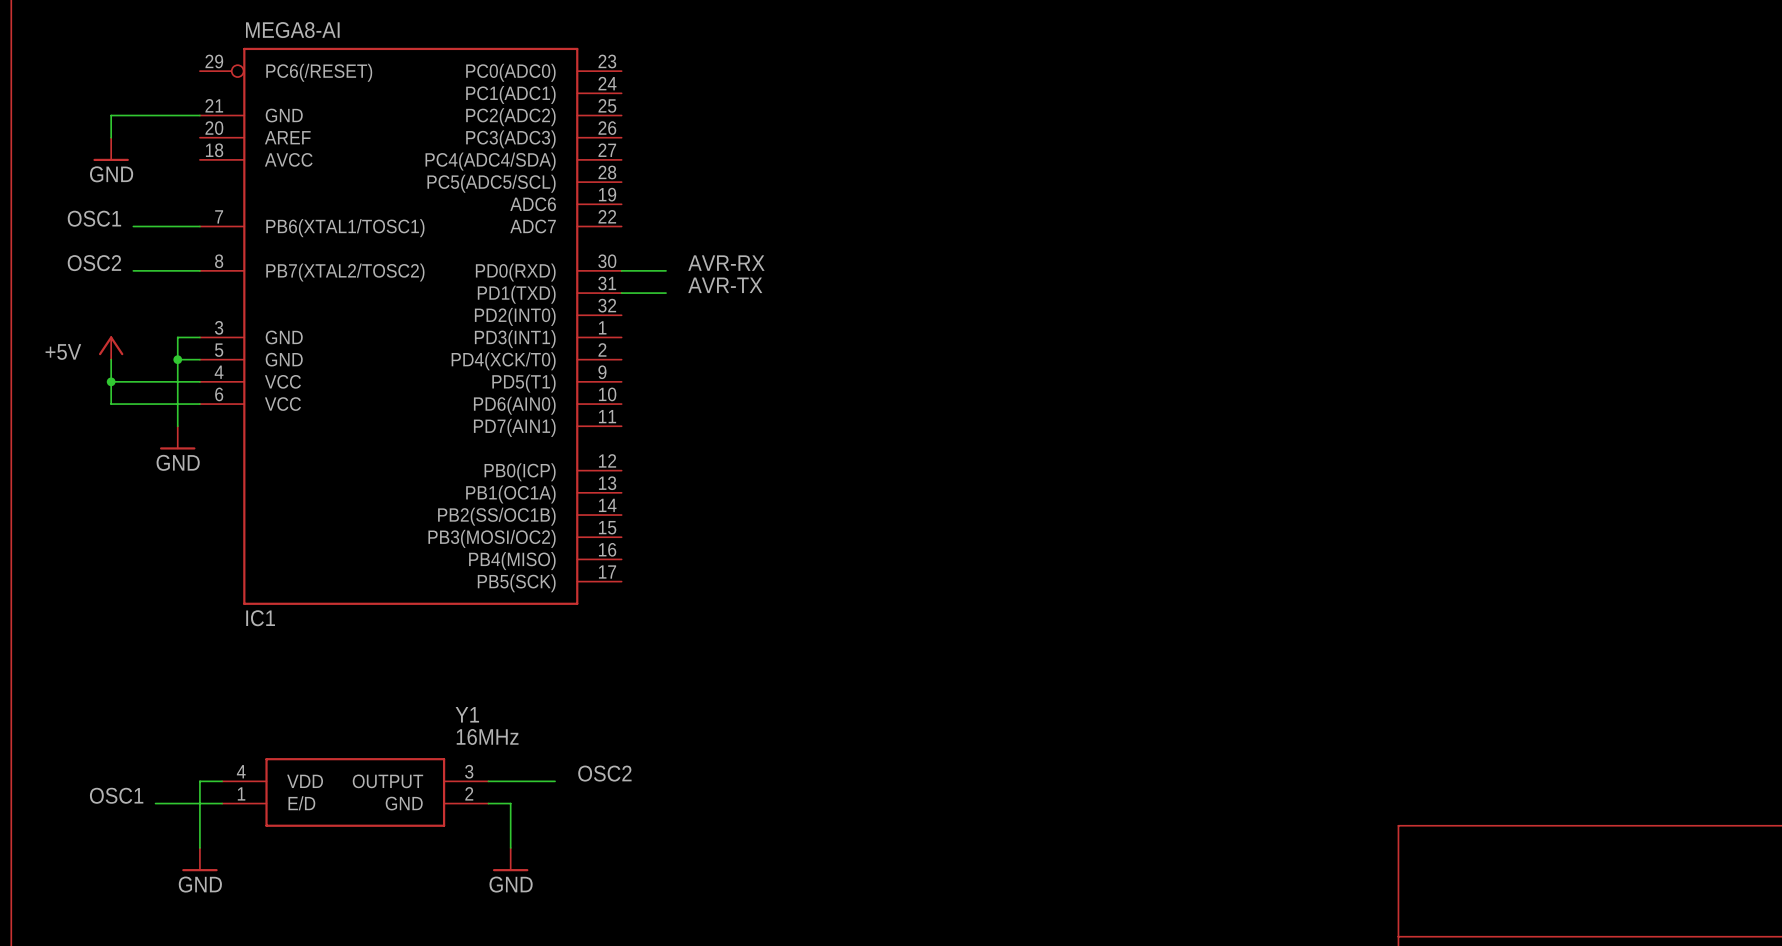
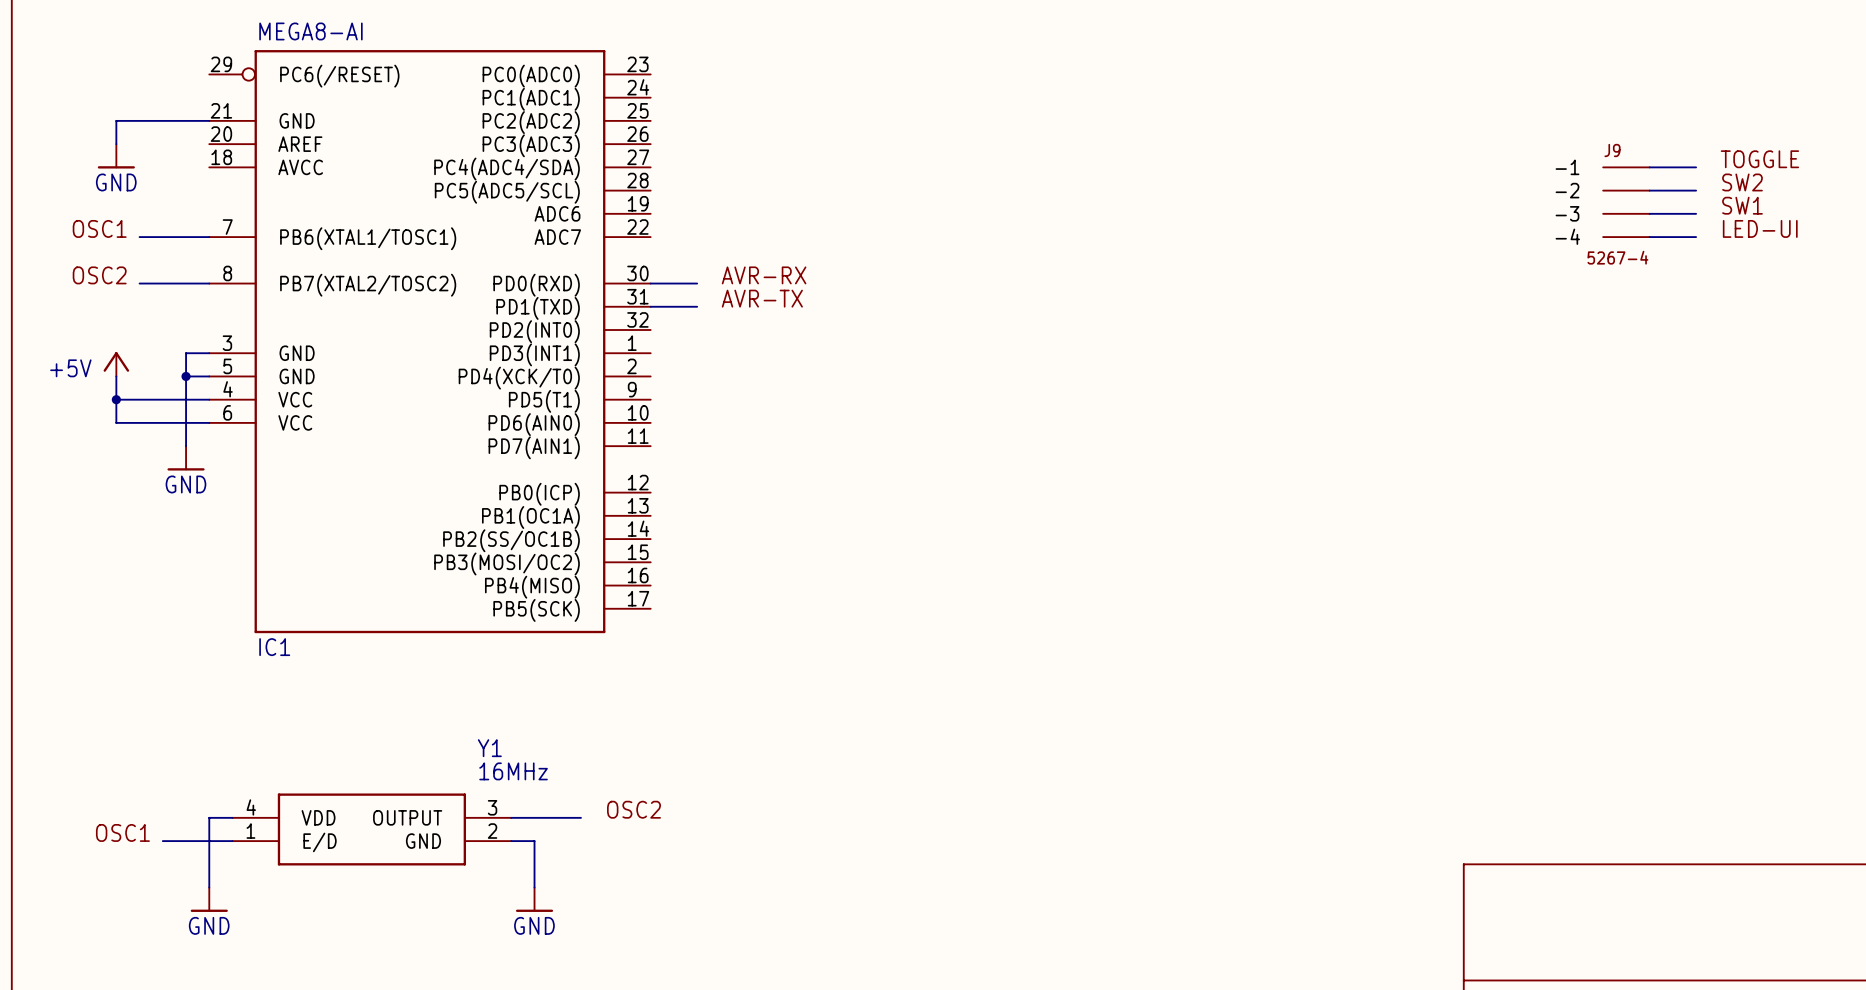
label: none -> TOGGLE (1759, 159)
wire: none -> (1649, 167) (1696, 167)
label: none -> SW2 (1742, 182)
wire: none -> (1649, 190) (1696, 190)
J9: none -> 5267-4 (1626, 202)
label: none -> SW1 (1742, 205)
wire: none -> (1649, 213) (1696, 213)
label: none -> LED-UI (1760, 228)
wire: none -> (1649, 237) (1696, 237)

